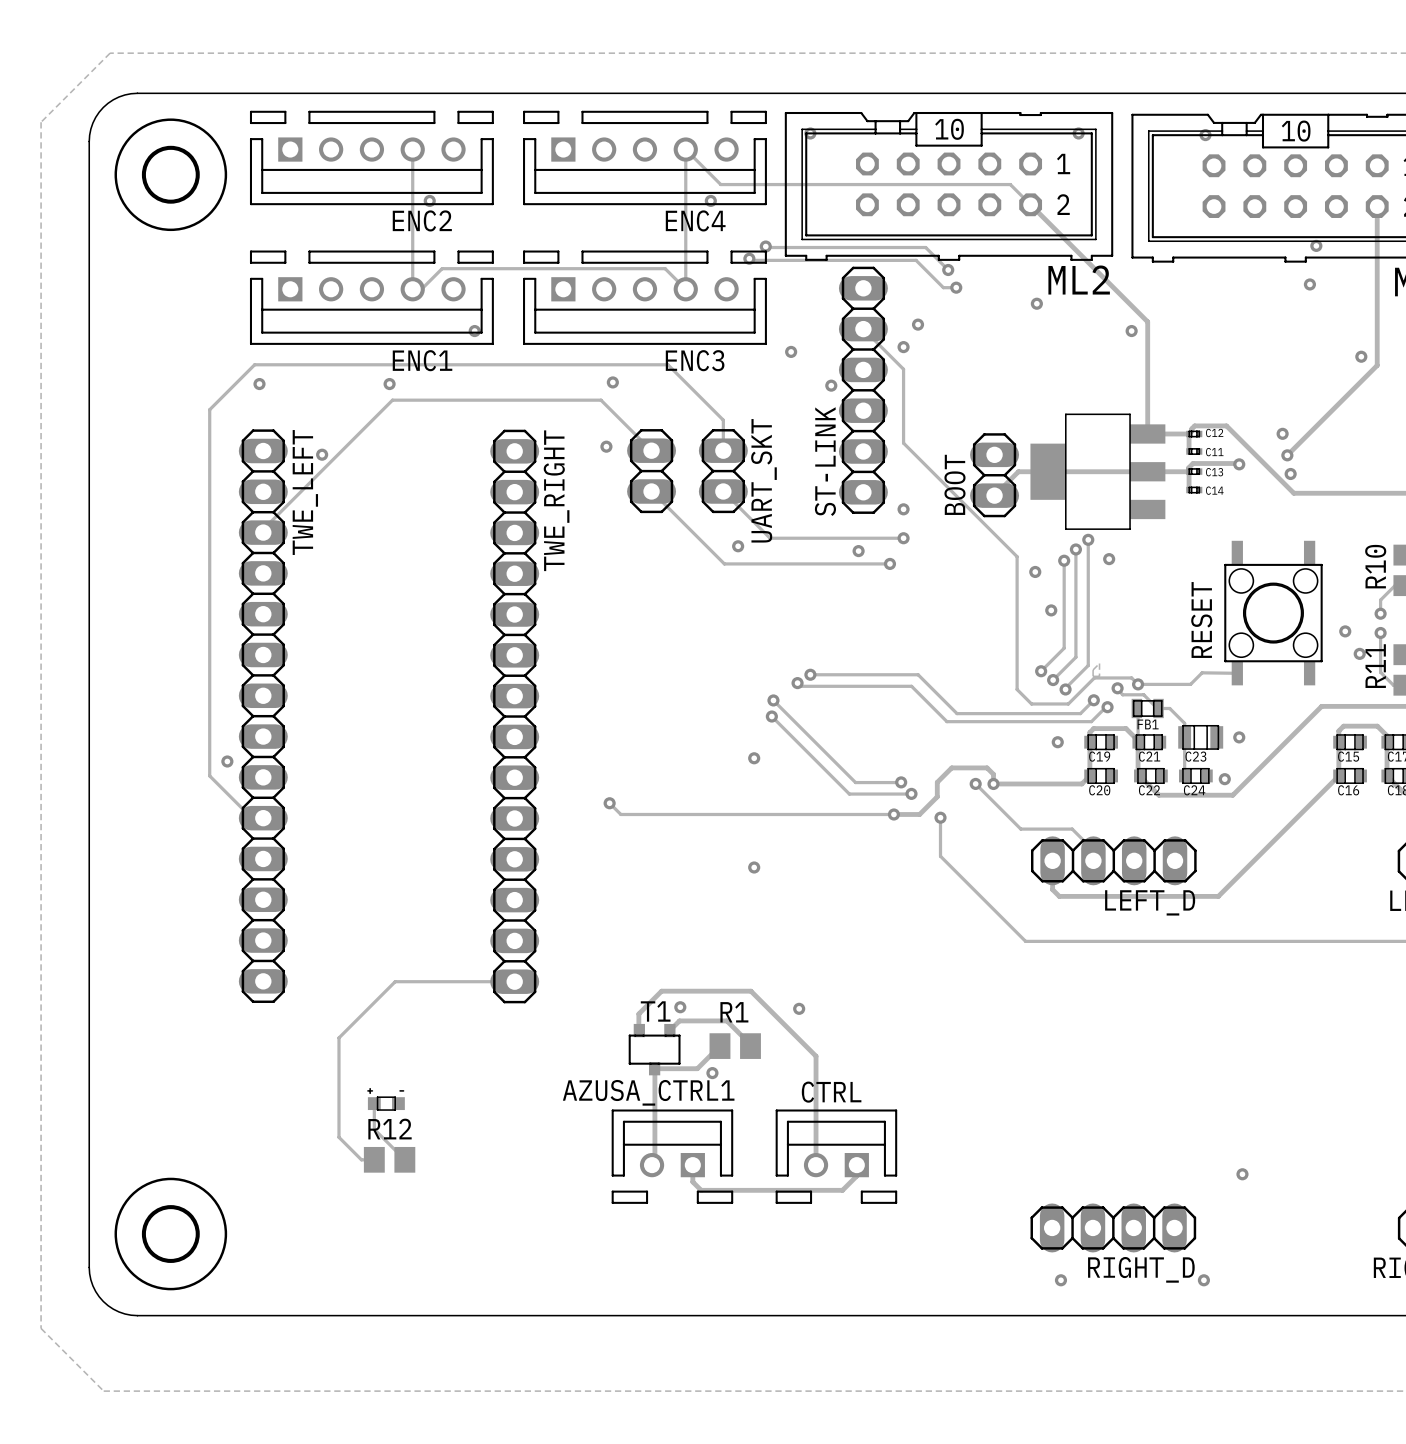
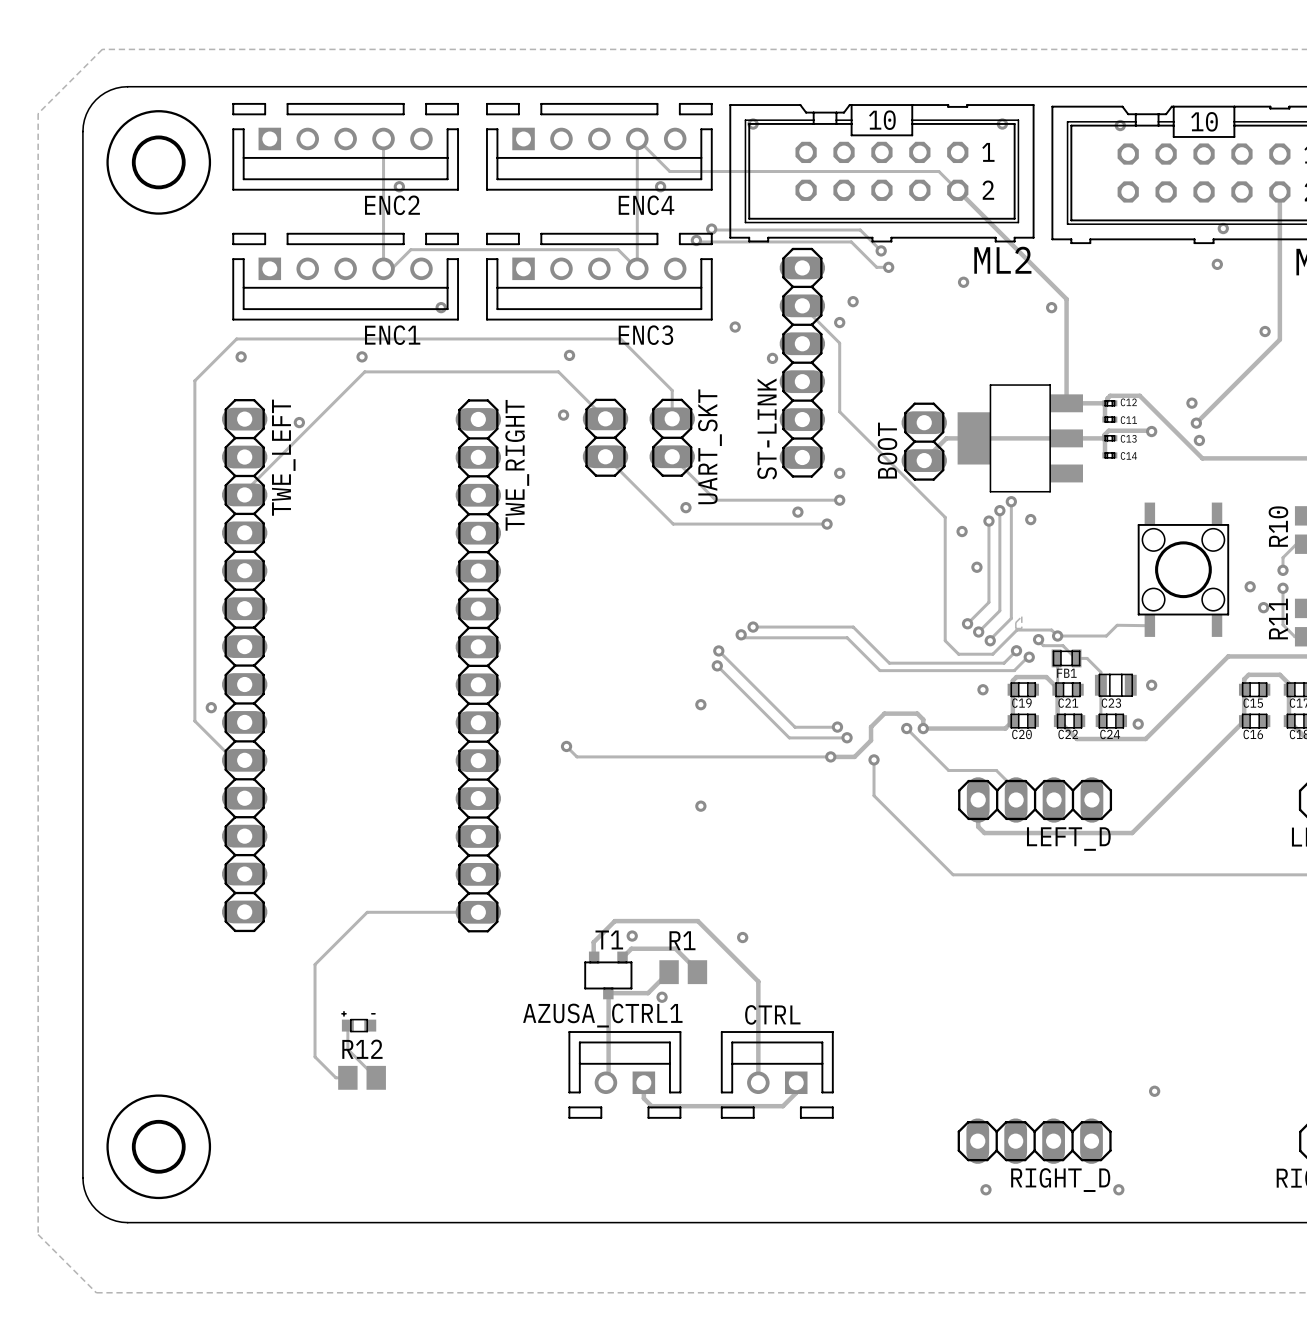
text: RESET (1201, 619) -> none

